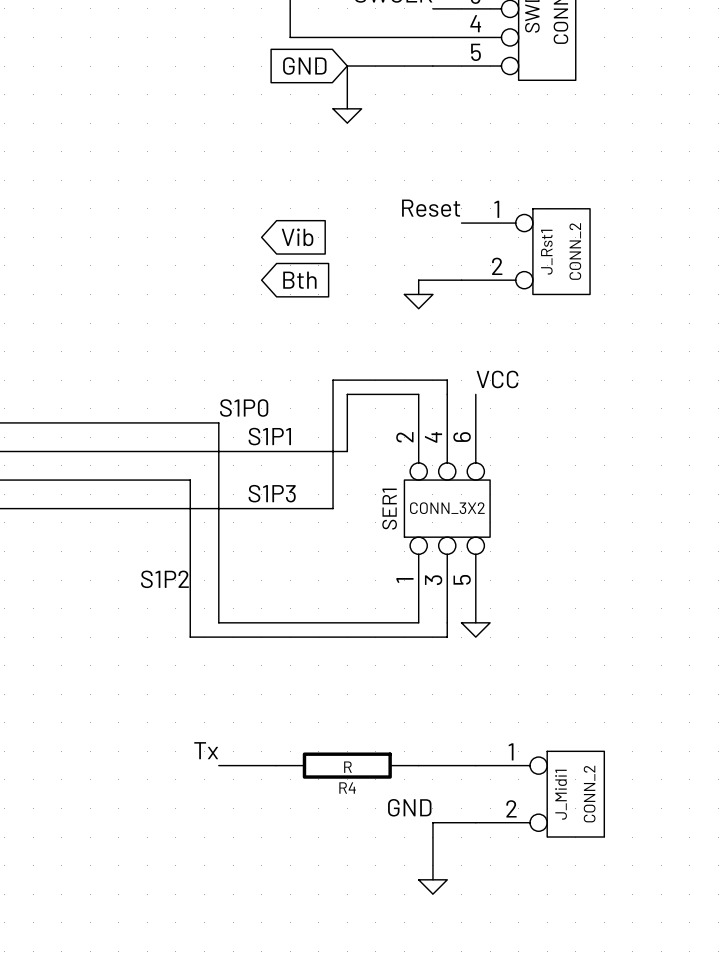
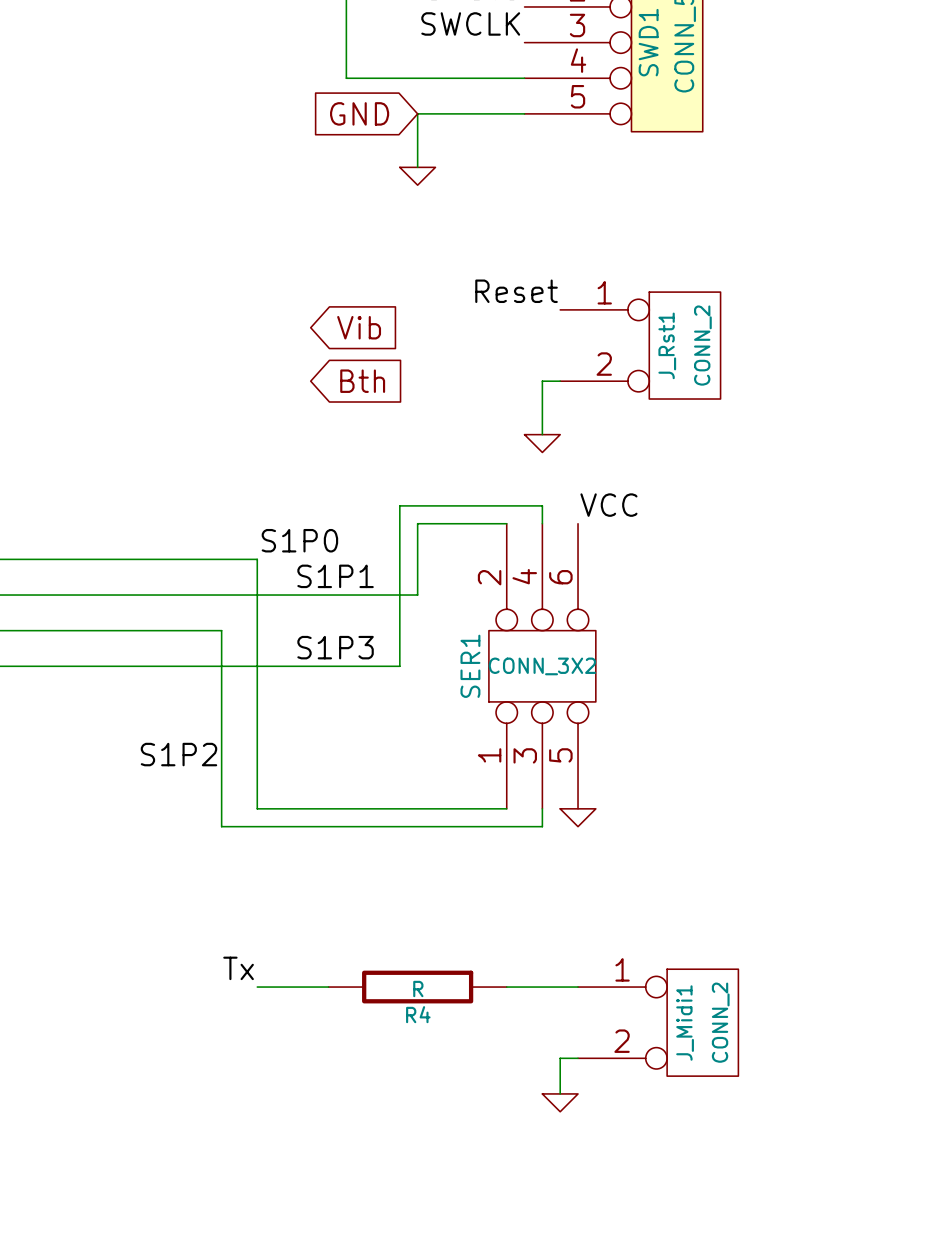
wire: (447, 280) (418, 280) (418, 294) -> (542, 381) (542, 434)
power symbol position: (418, 301) -> (542, 443)
label: GND (409, 807) -> none
wire: (461, 822) (432, 822) (432, 879) -> (560, 1058) (560, 1093)
power symbol position: (432, 886) -> (560, 1102)

